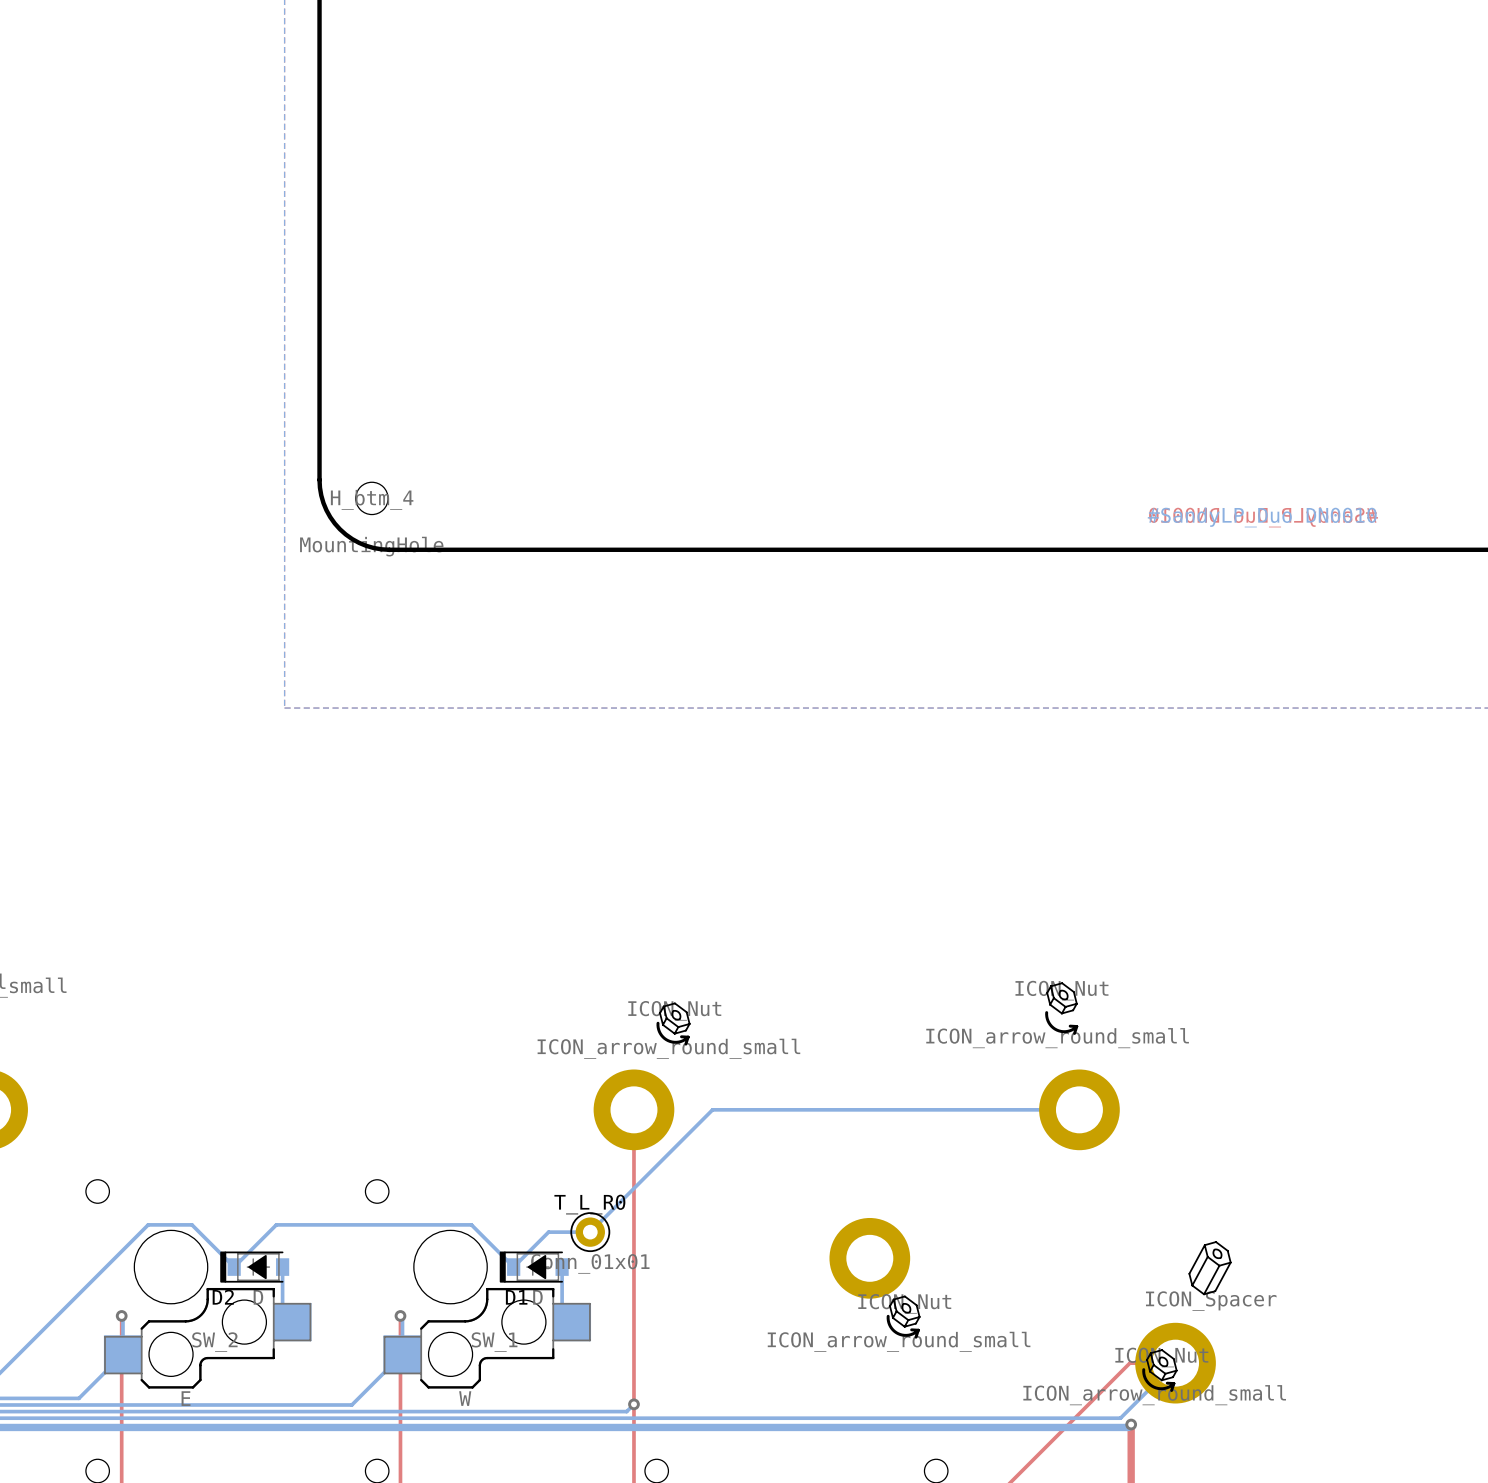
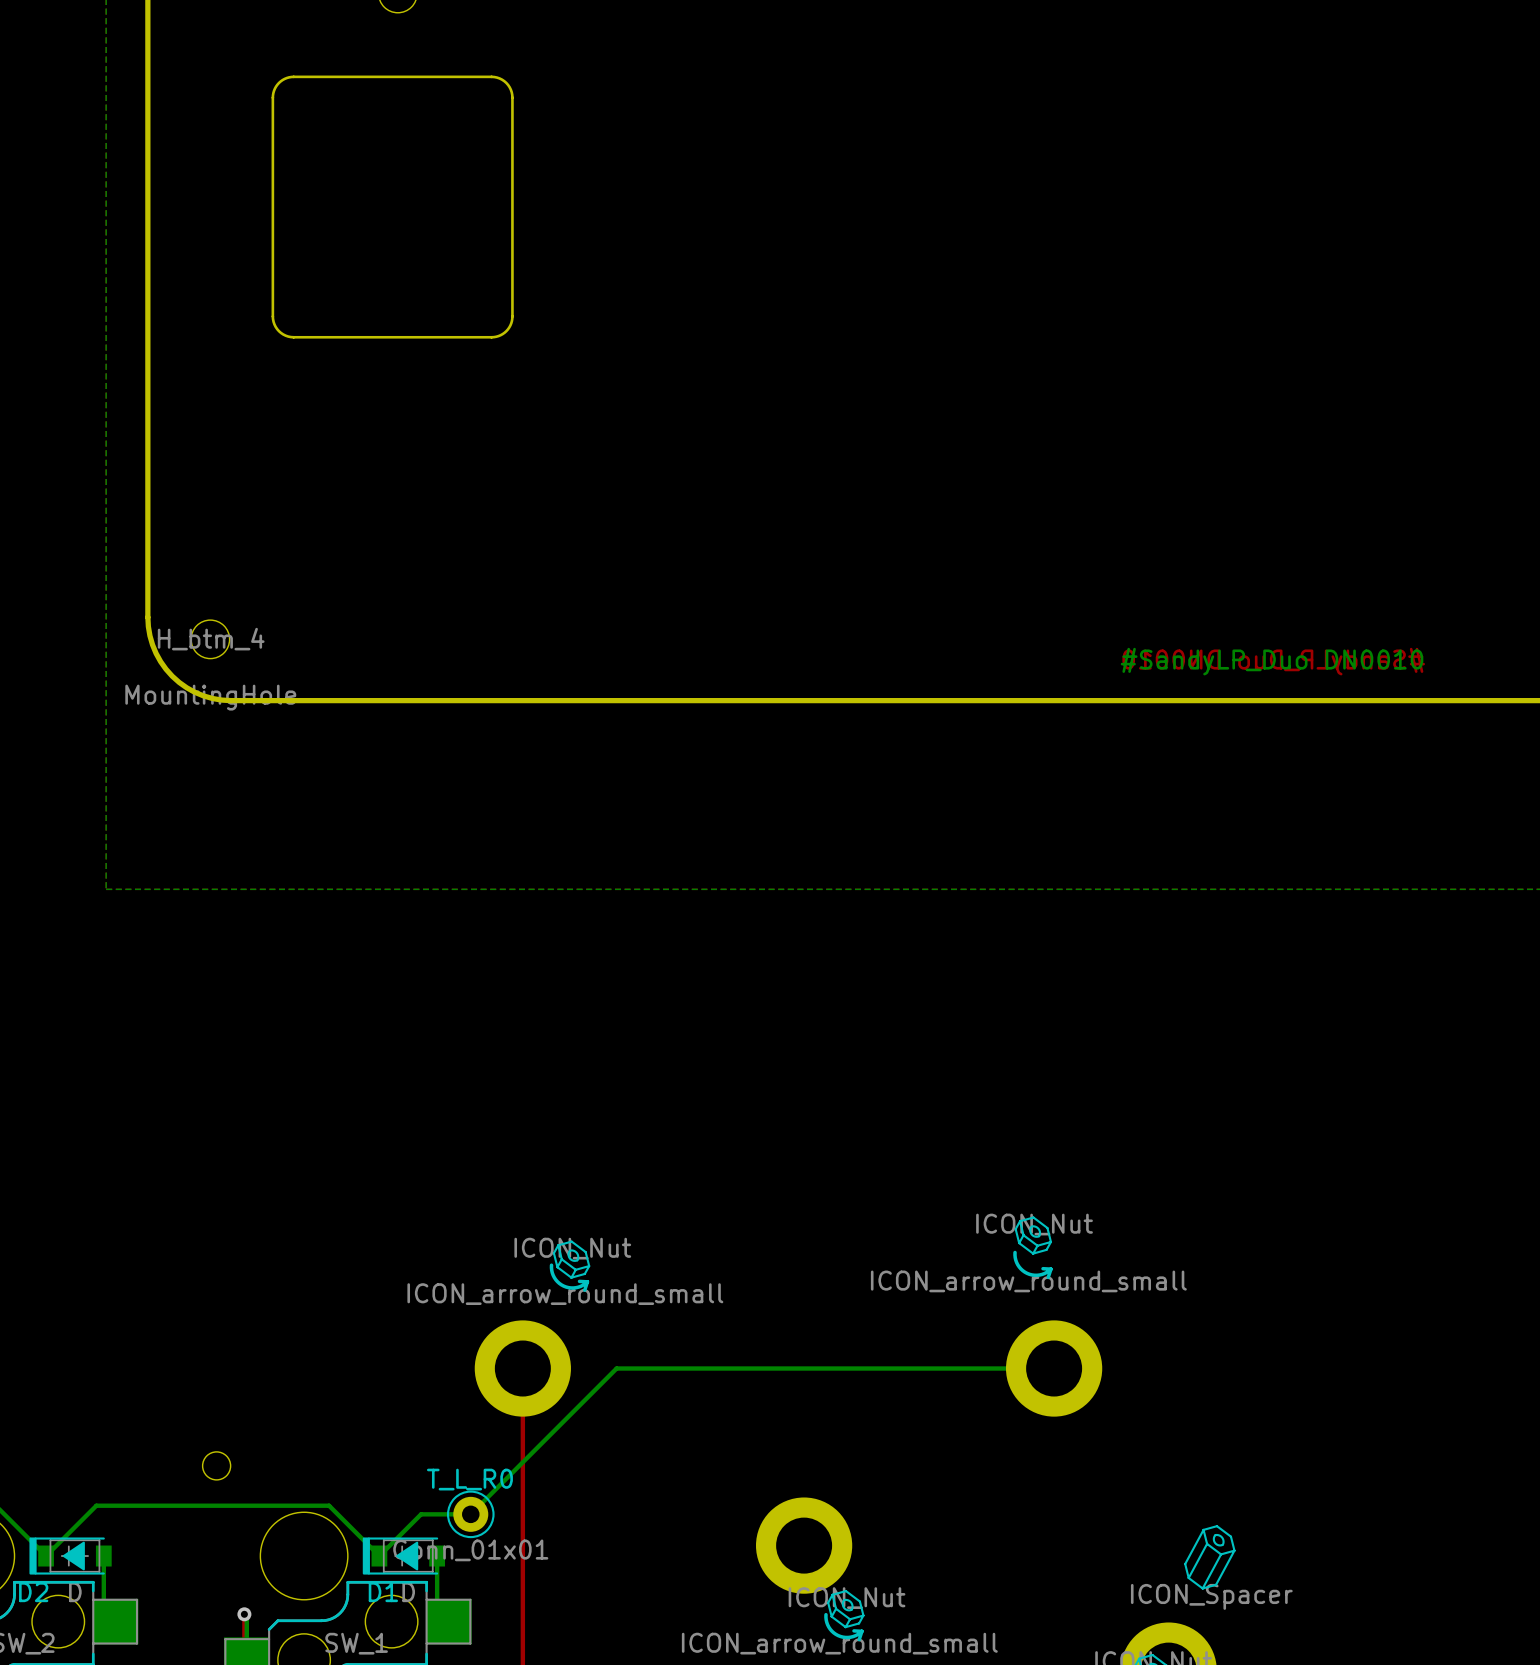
board edge: none -> (491, 76) (293, 76) (284, 78) (277, 84) (272, 97) (272, 316) (275, 326) (281, 332) (293, 337) (491, 337) (500, 335) (507, 329) (512, 316) (512, 97) (510, 89) (506, 82) (499, 78) (491, 76)

